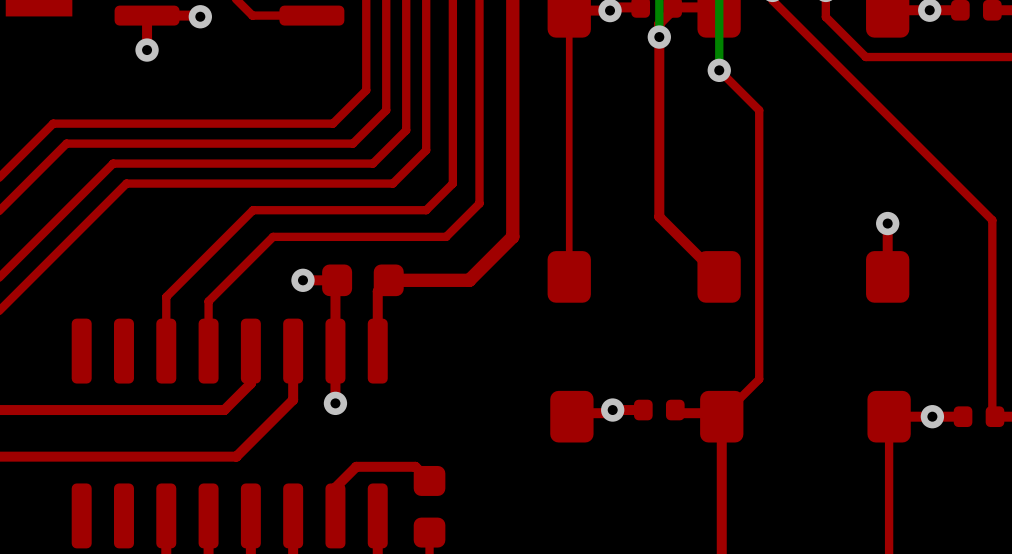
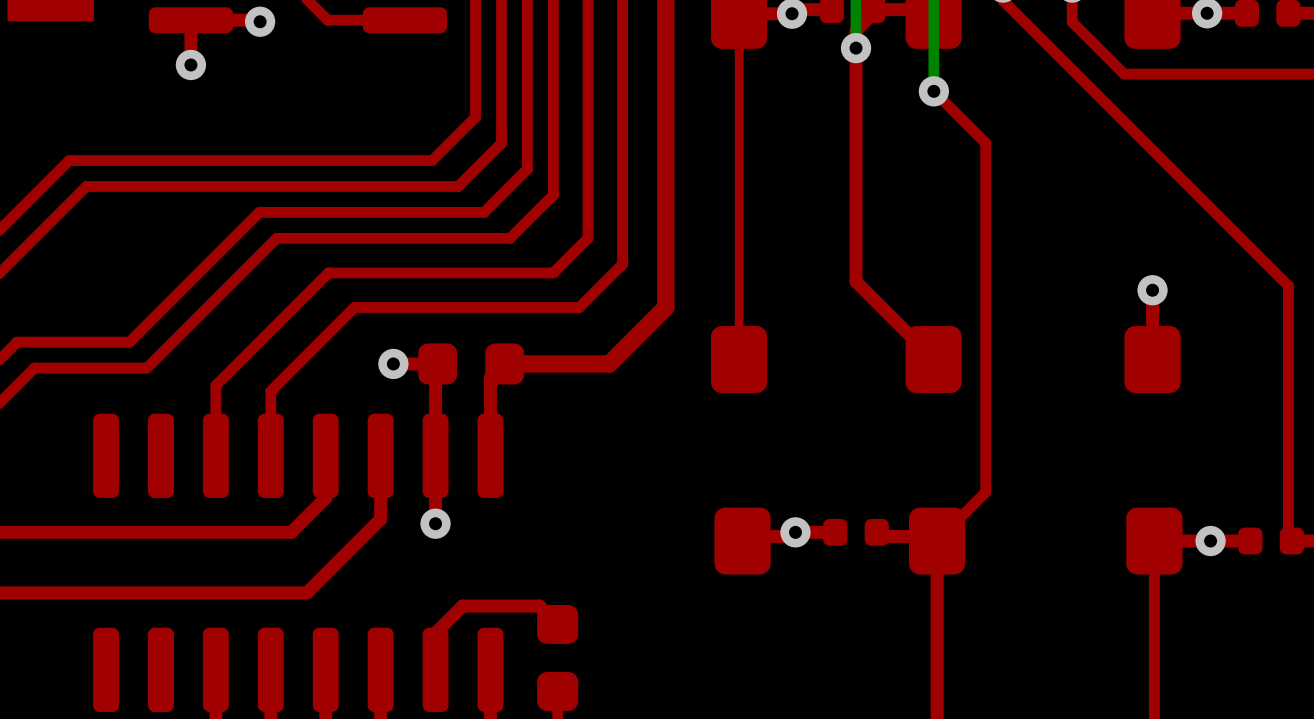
top track: (199, 163) (113, 163) (13, 263) -> (259, 212) (129, 342) (17, 342)
top track: (213, 183) (126, 183) (26, 283) -> (276, 238) (146, 368) (34, 368)

